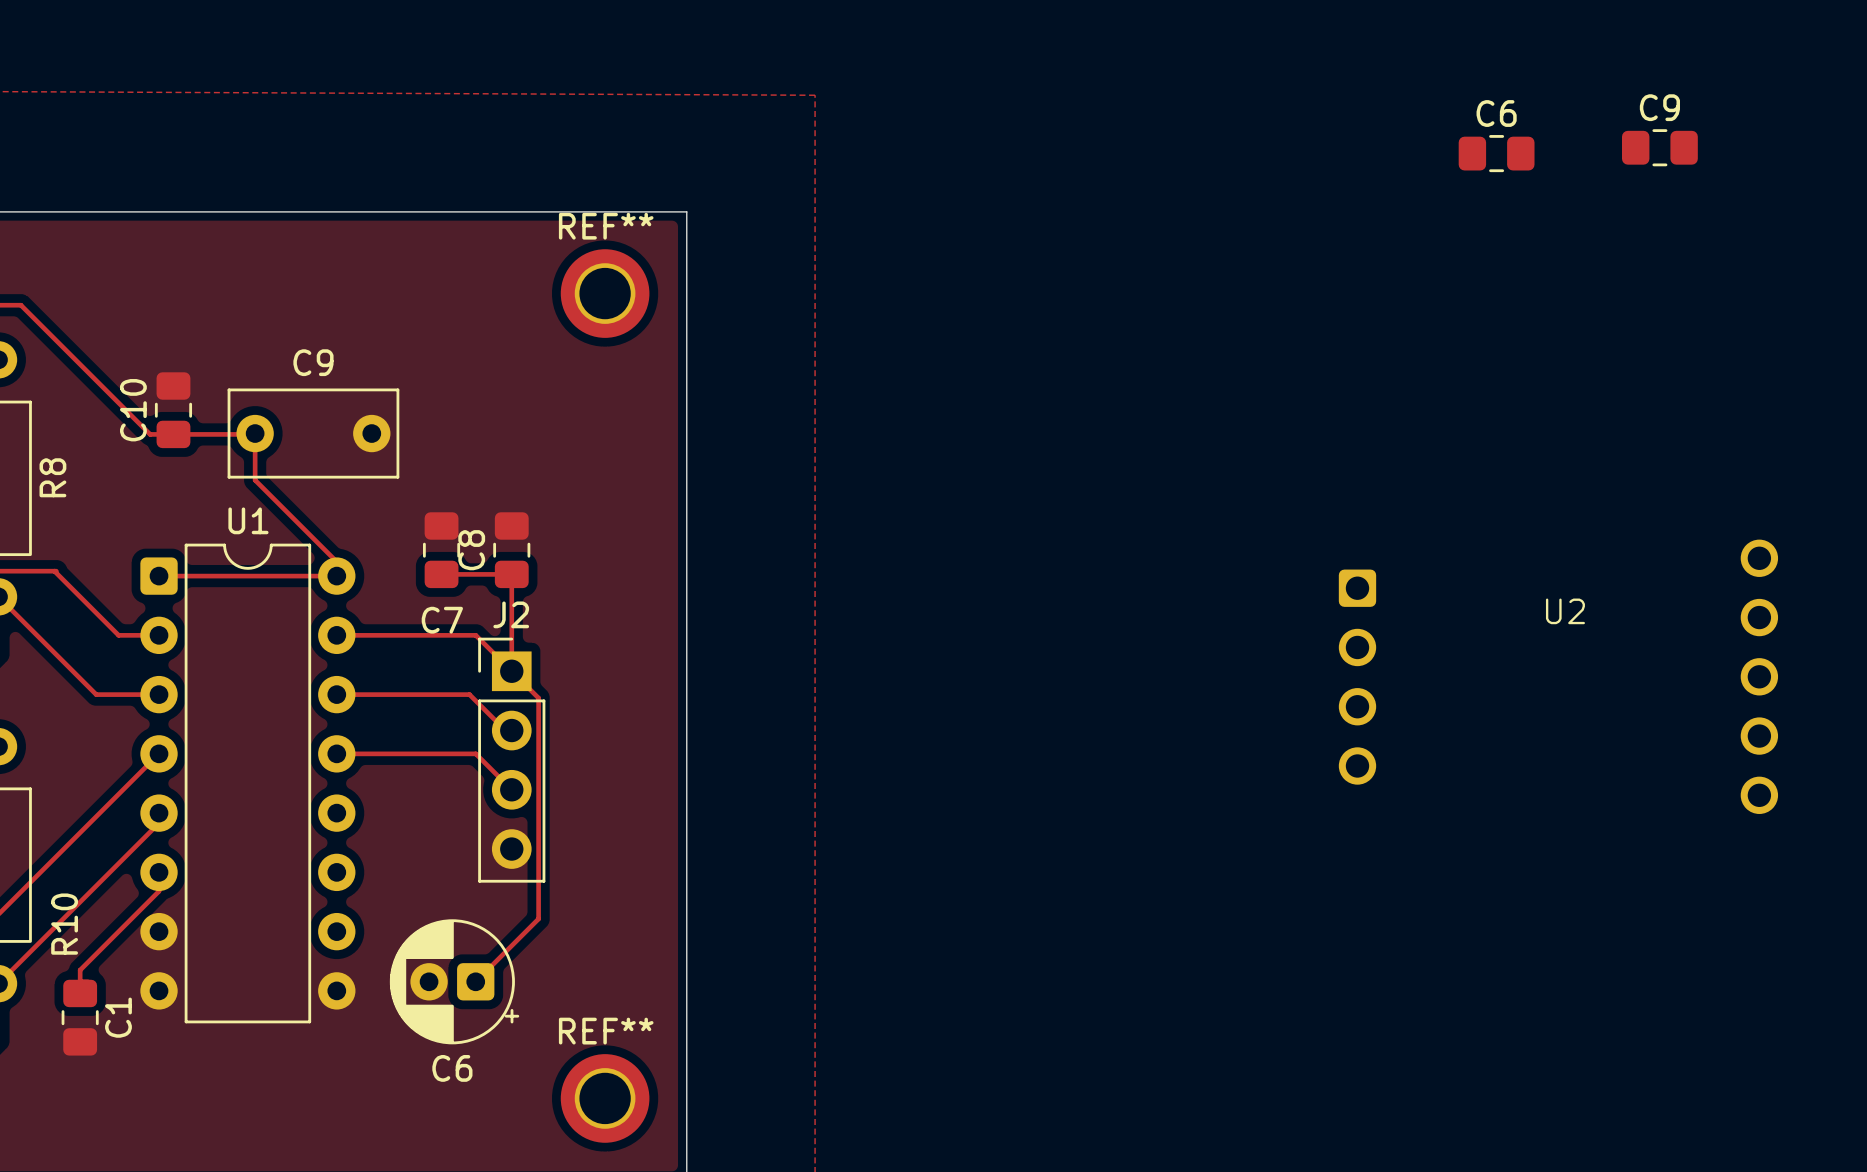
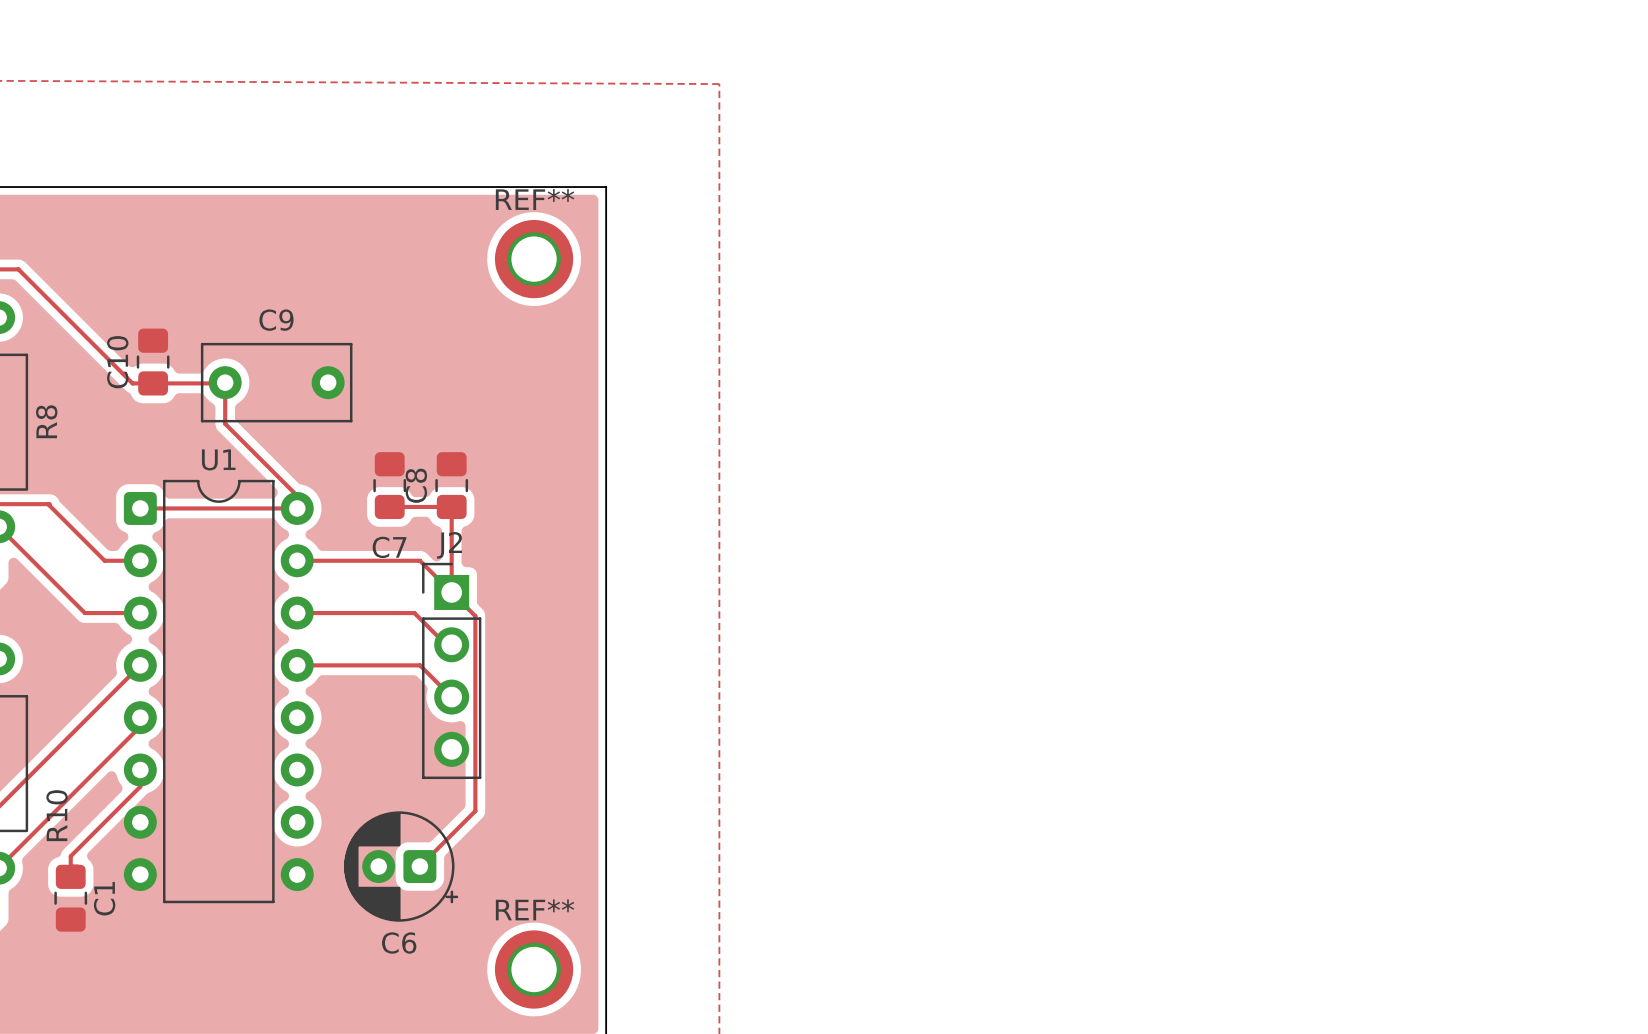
C9: (1659, 147) -> none
C6: (1496, 153) -> none
U2: (1558, 676) -> none

